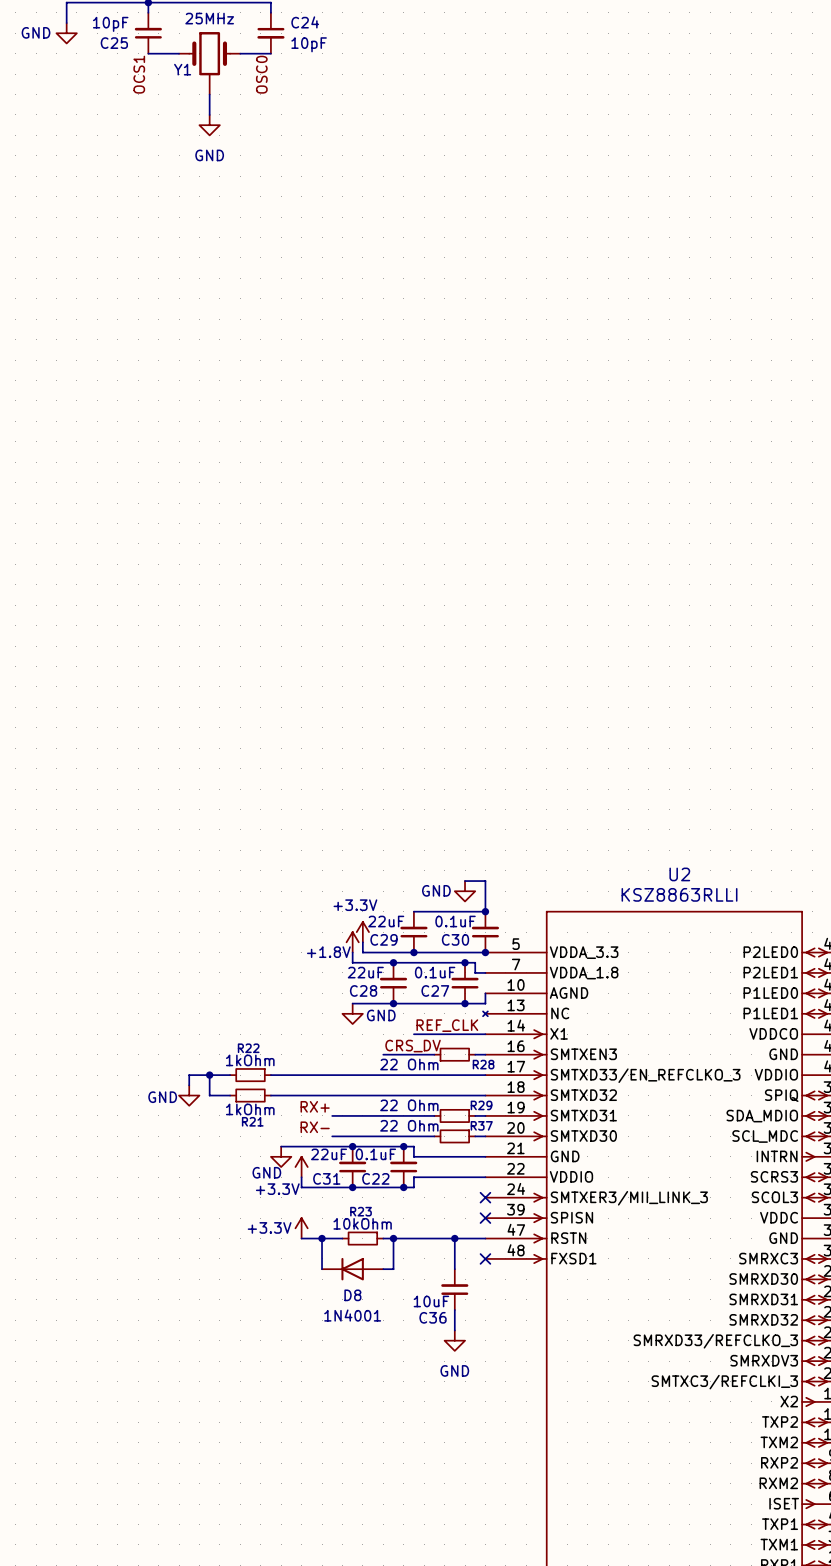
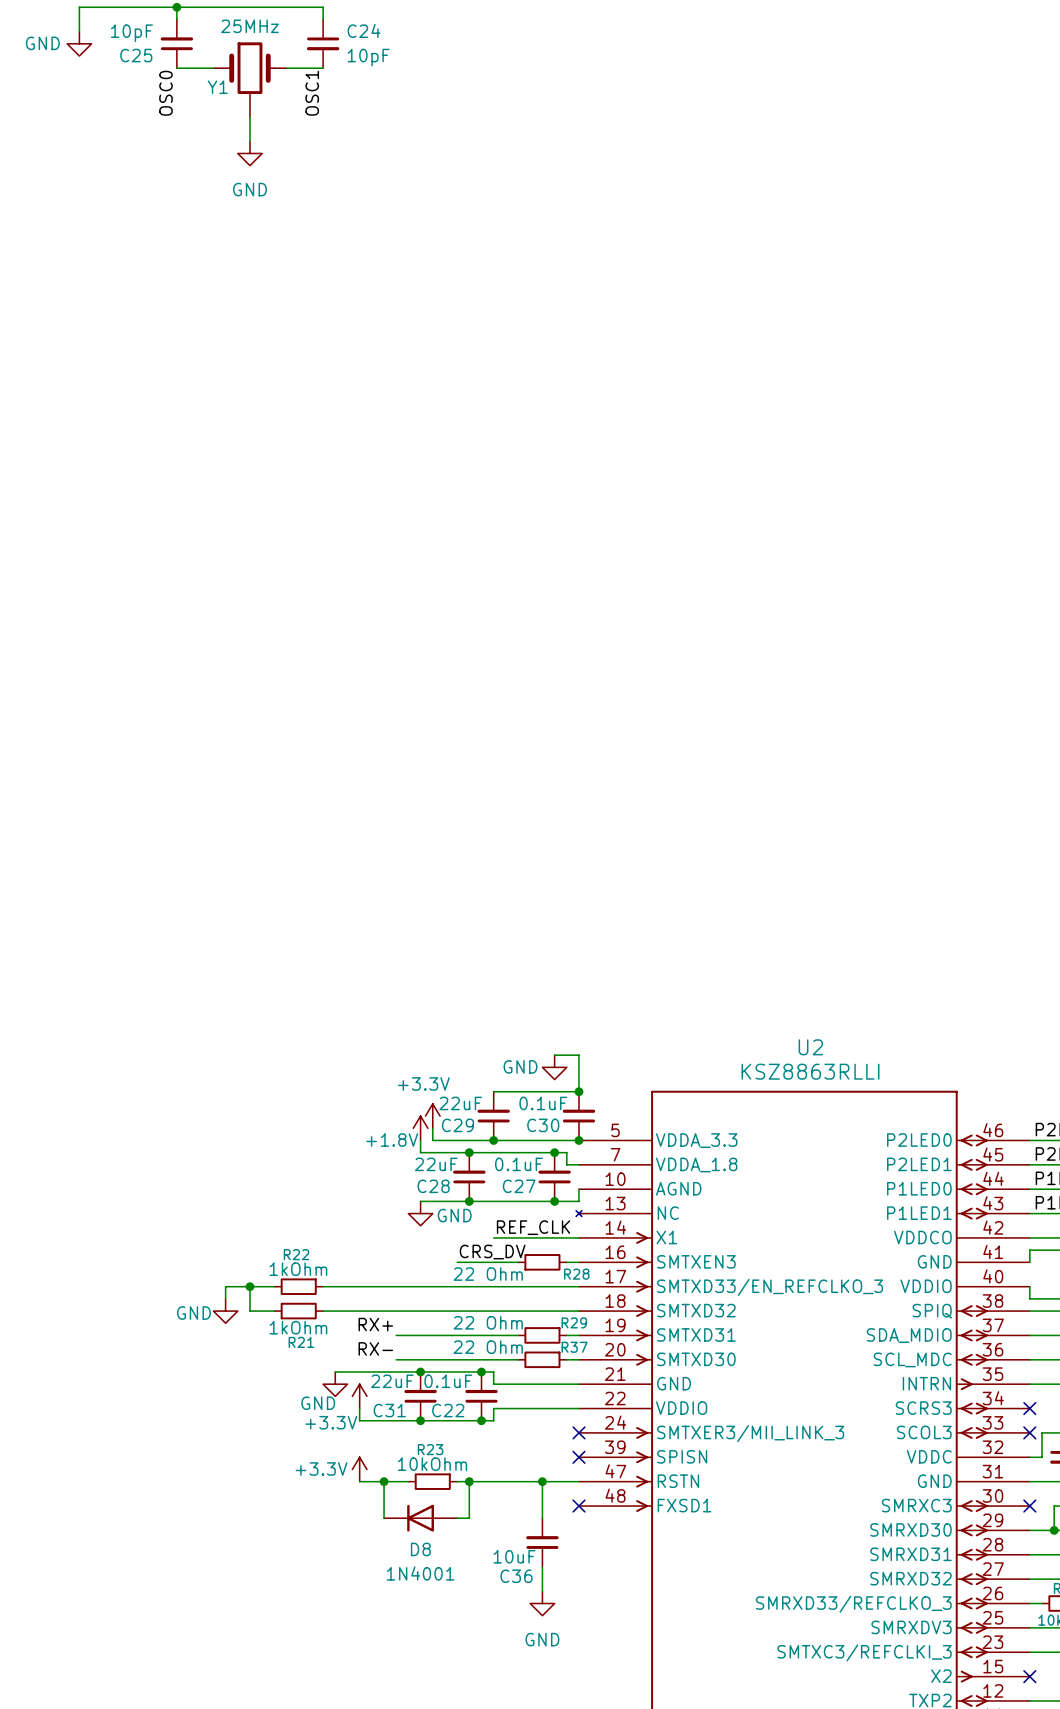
label: OCS1 (139, 74) -> OSC0 (166, 93)
label: OSC0 (261, 74) -> OSC1 (312, 93)

